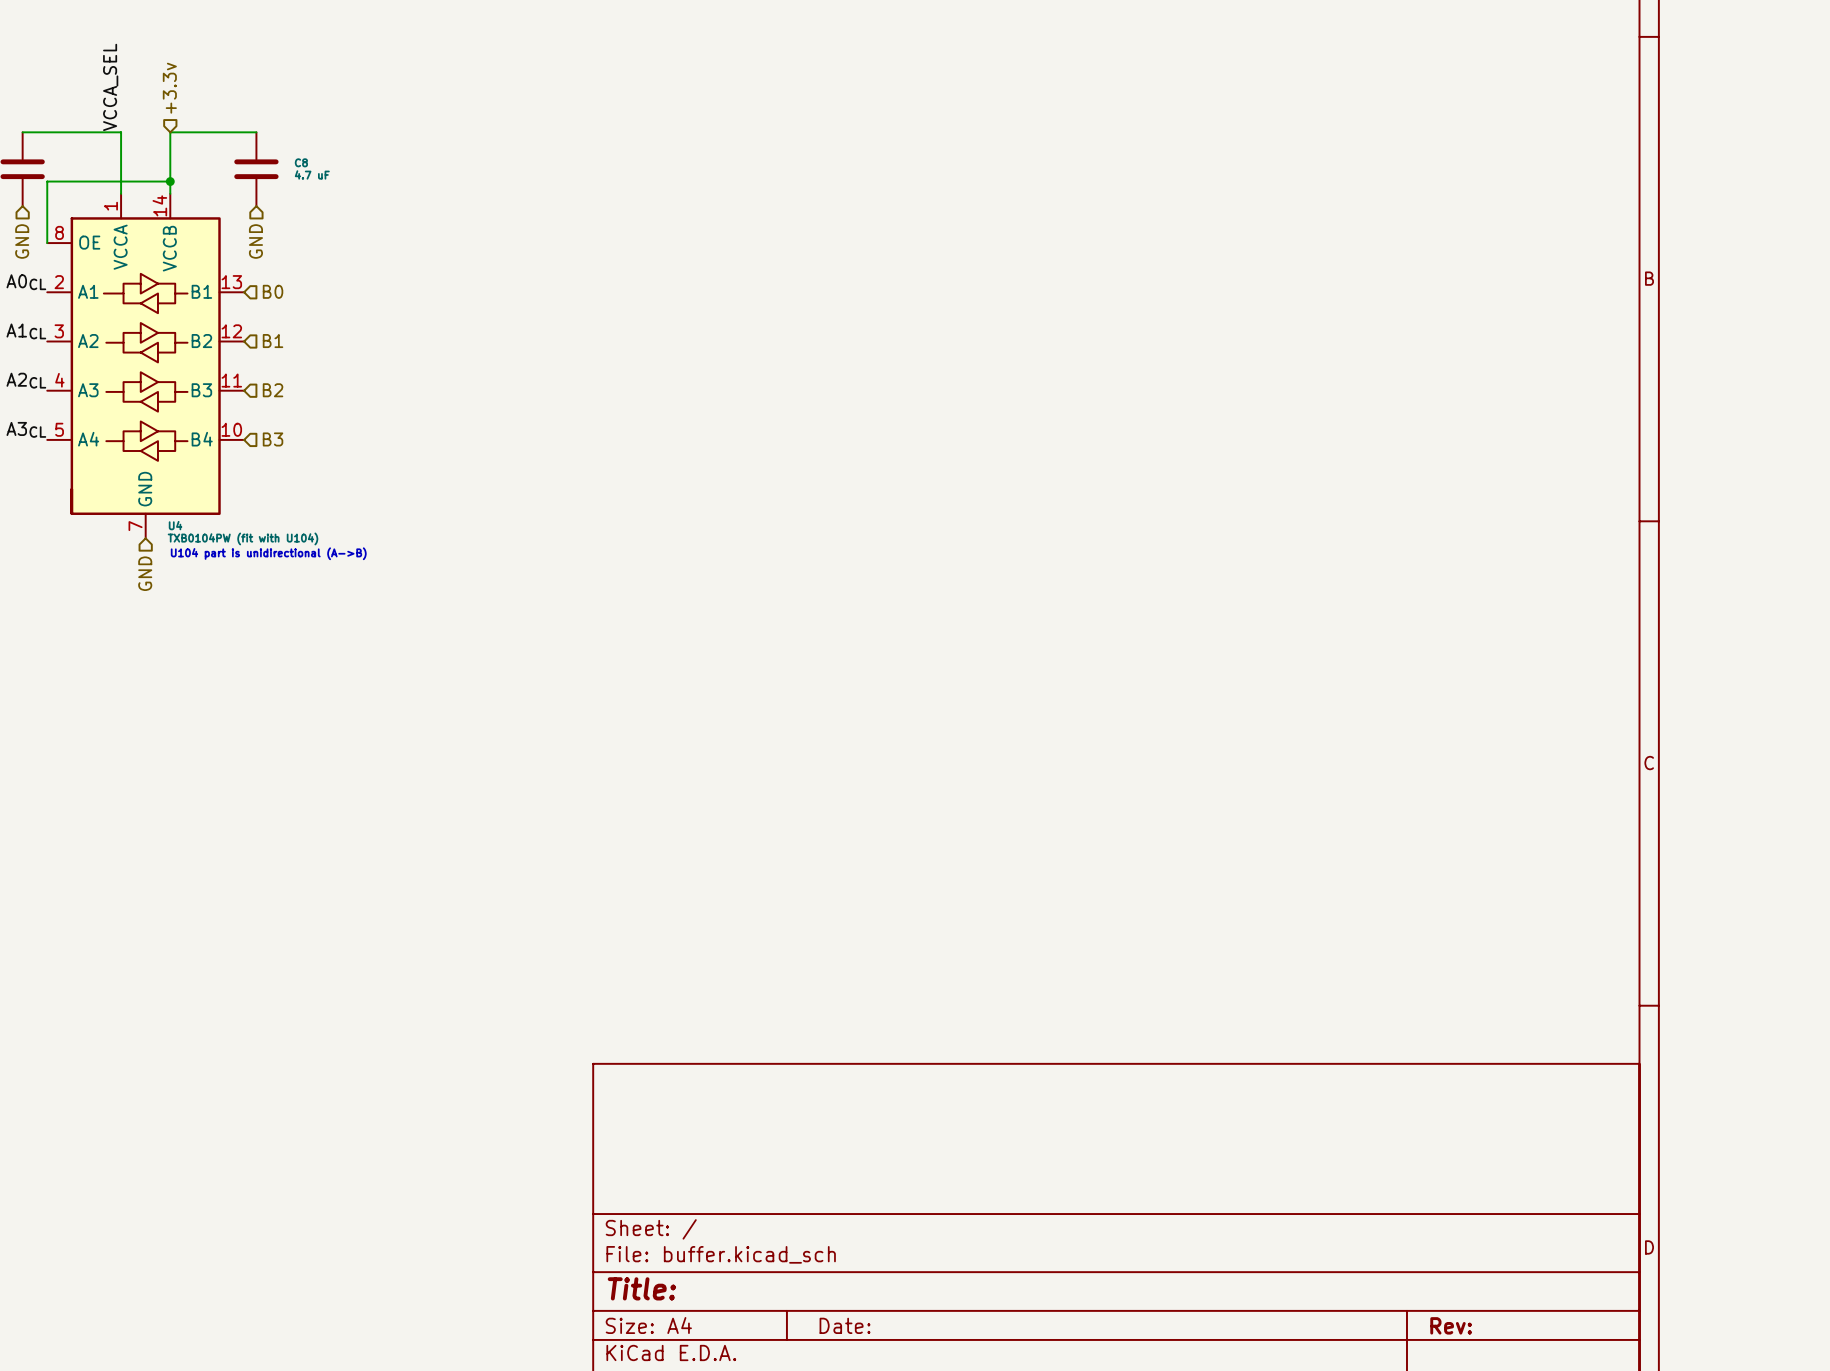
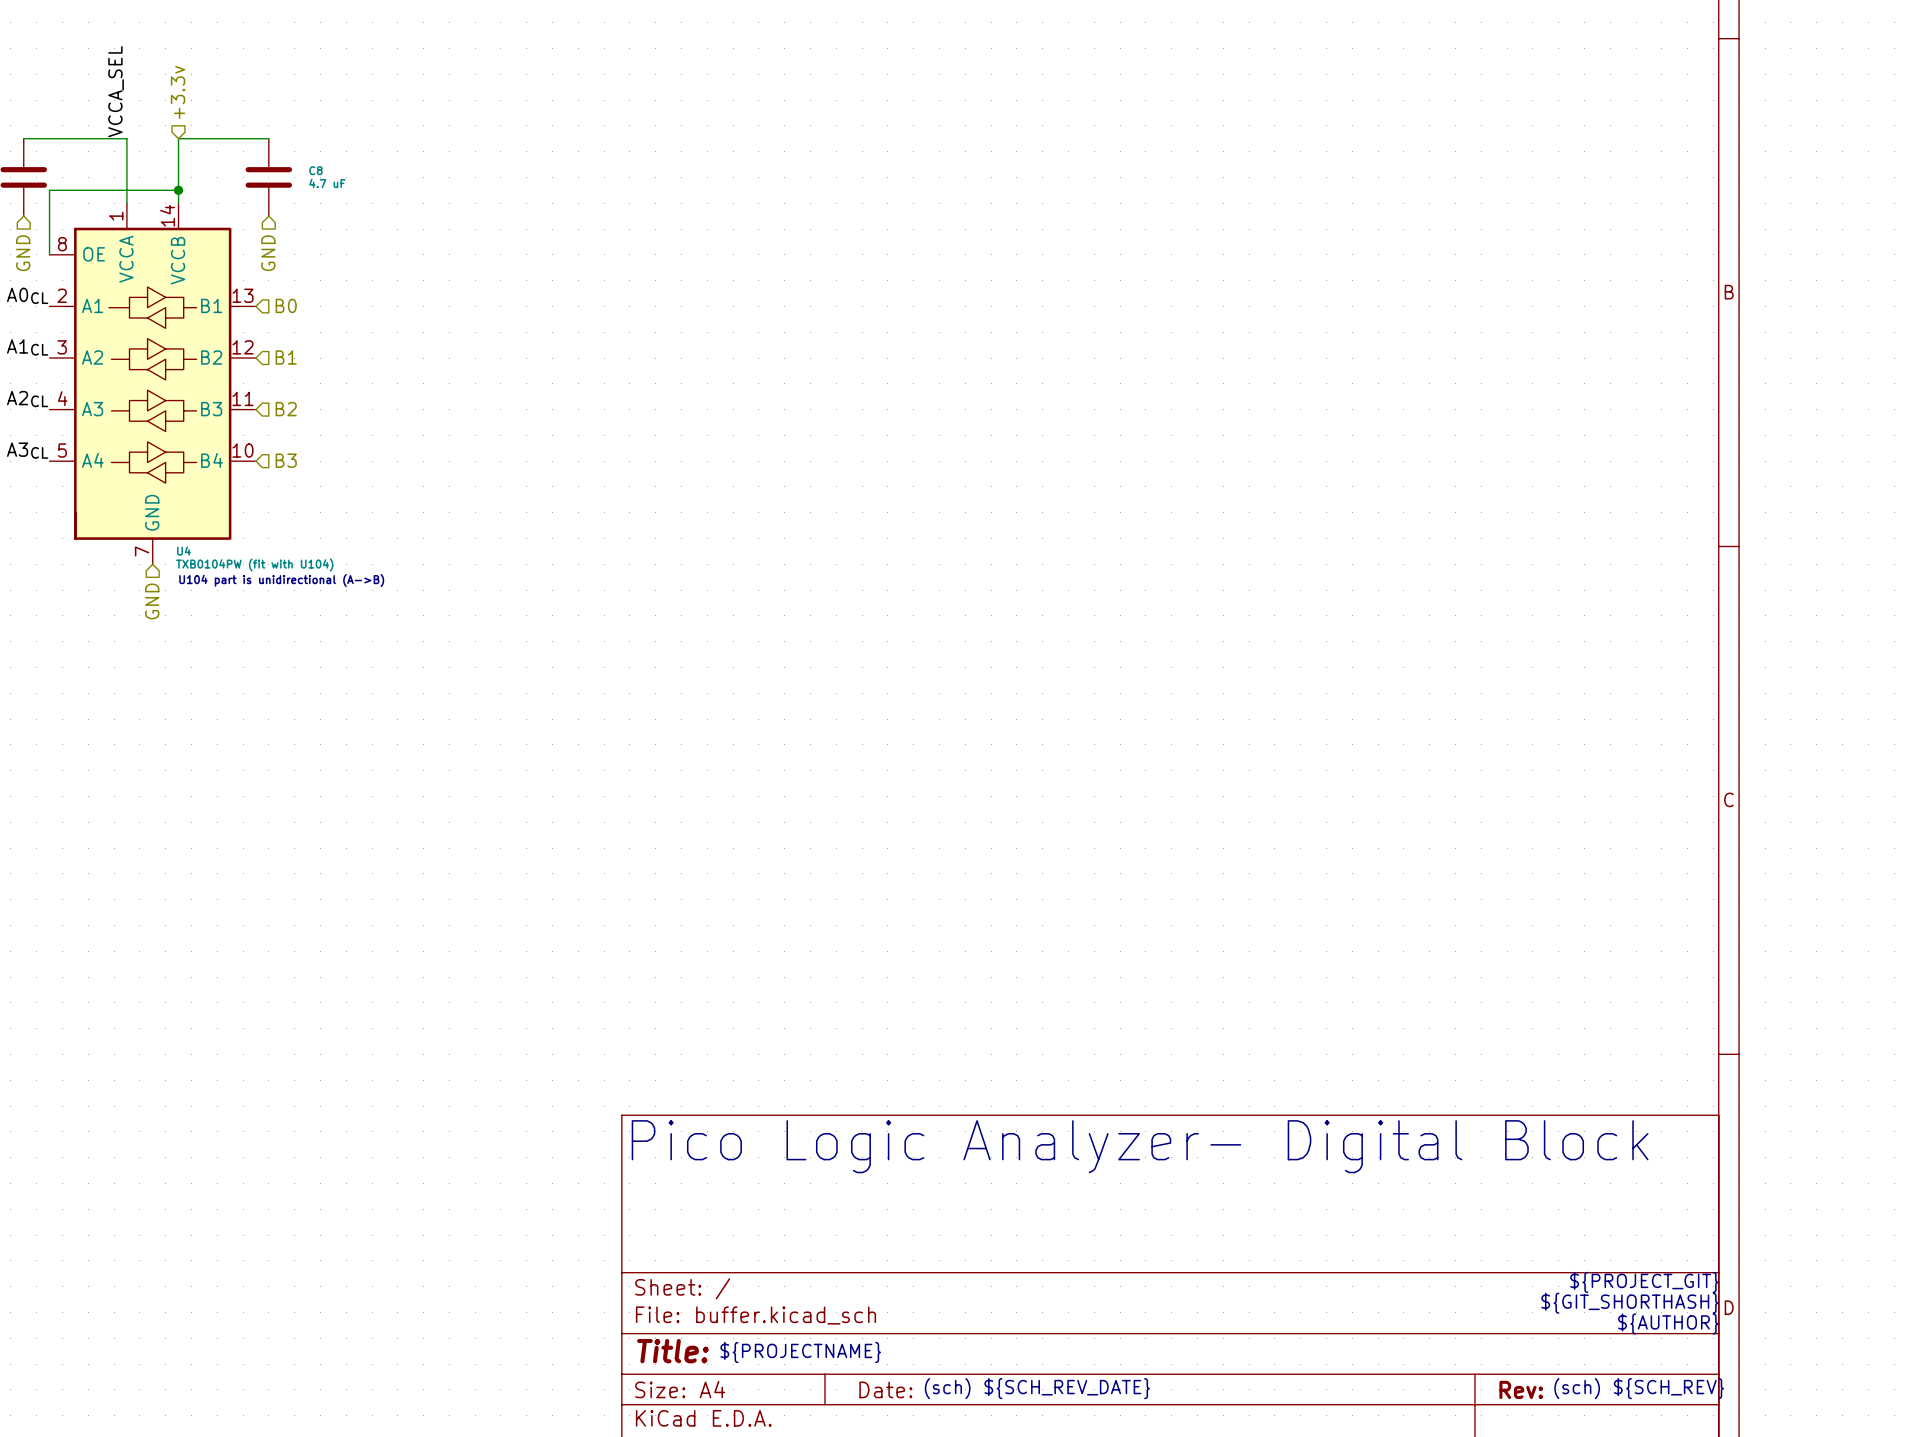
text: none -> Pico Logic Analyzer- Digital Block (1140, 1146)
text: none -> ${PROJECT_GIT} (1644, 1282)
text: none -> ${GIT_SHORTHASH} (1629, 1303)
text: none -> ${AUTHOR} (1668, 1323)
text: none -> ${PROJECTNAME} (800, 1352)
text: none -> (sch) ${SCH_REV_DATE} (1037, 1388)
text: none -> (sch) ${SCH_REV} (1639, 1388)

